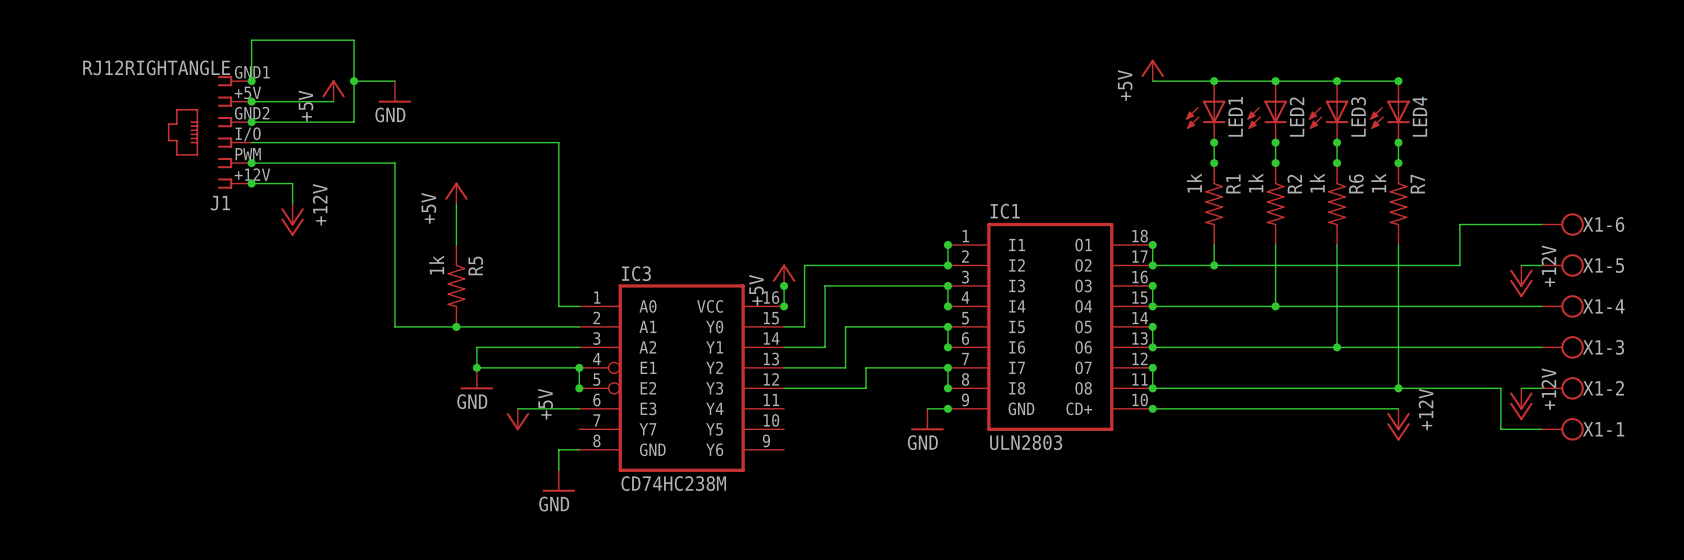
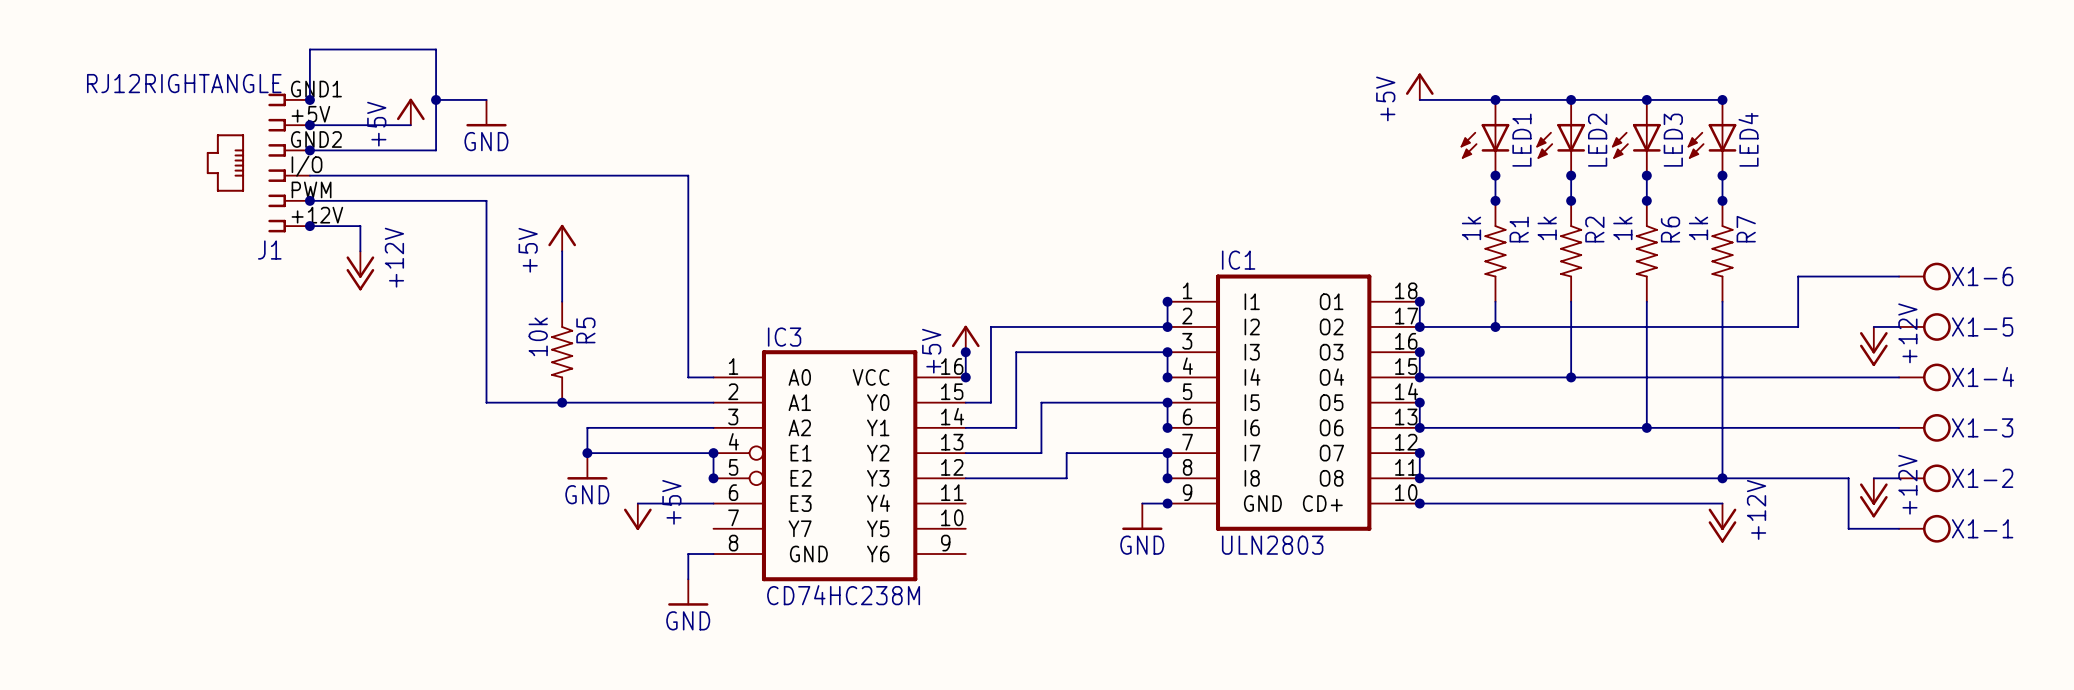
R5 value: 1k (436, 264) -> 10k (538, 336)

